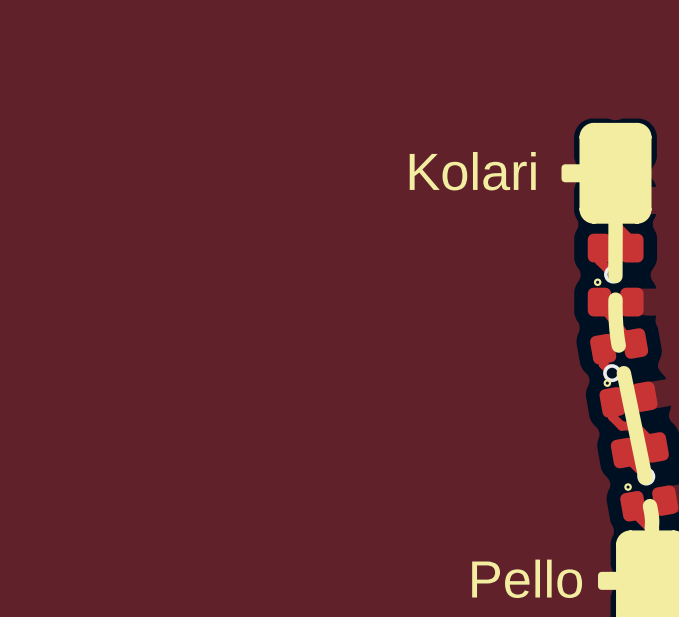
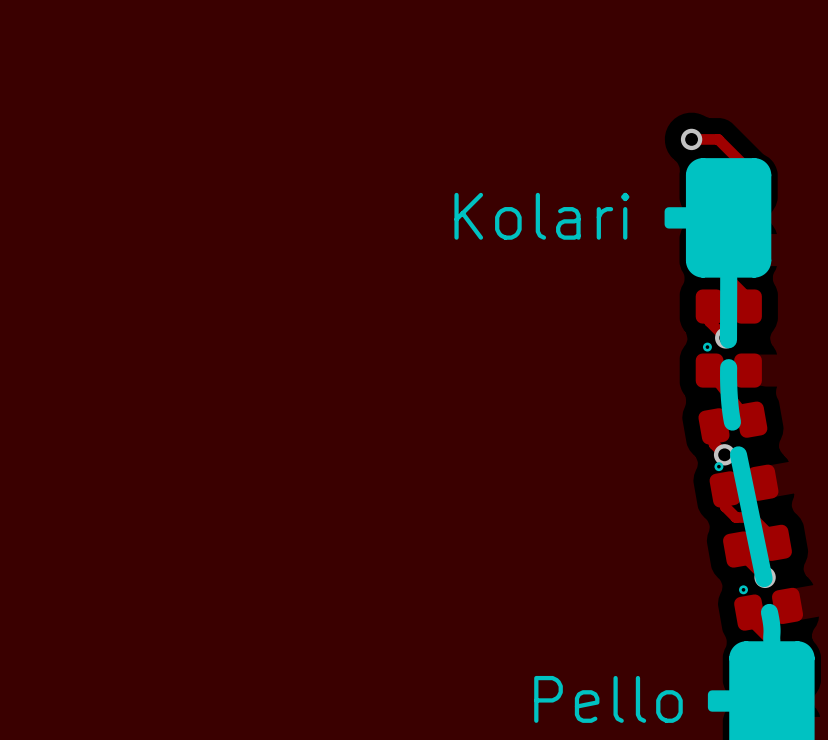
track: none -> (691, 139) (718, 139) (747, 168) (747, 186)
via: none -> (691, 139)

